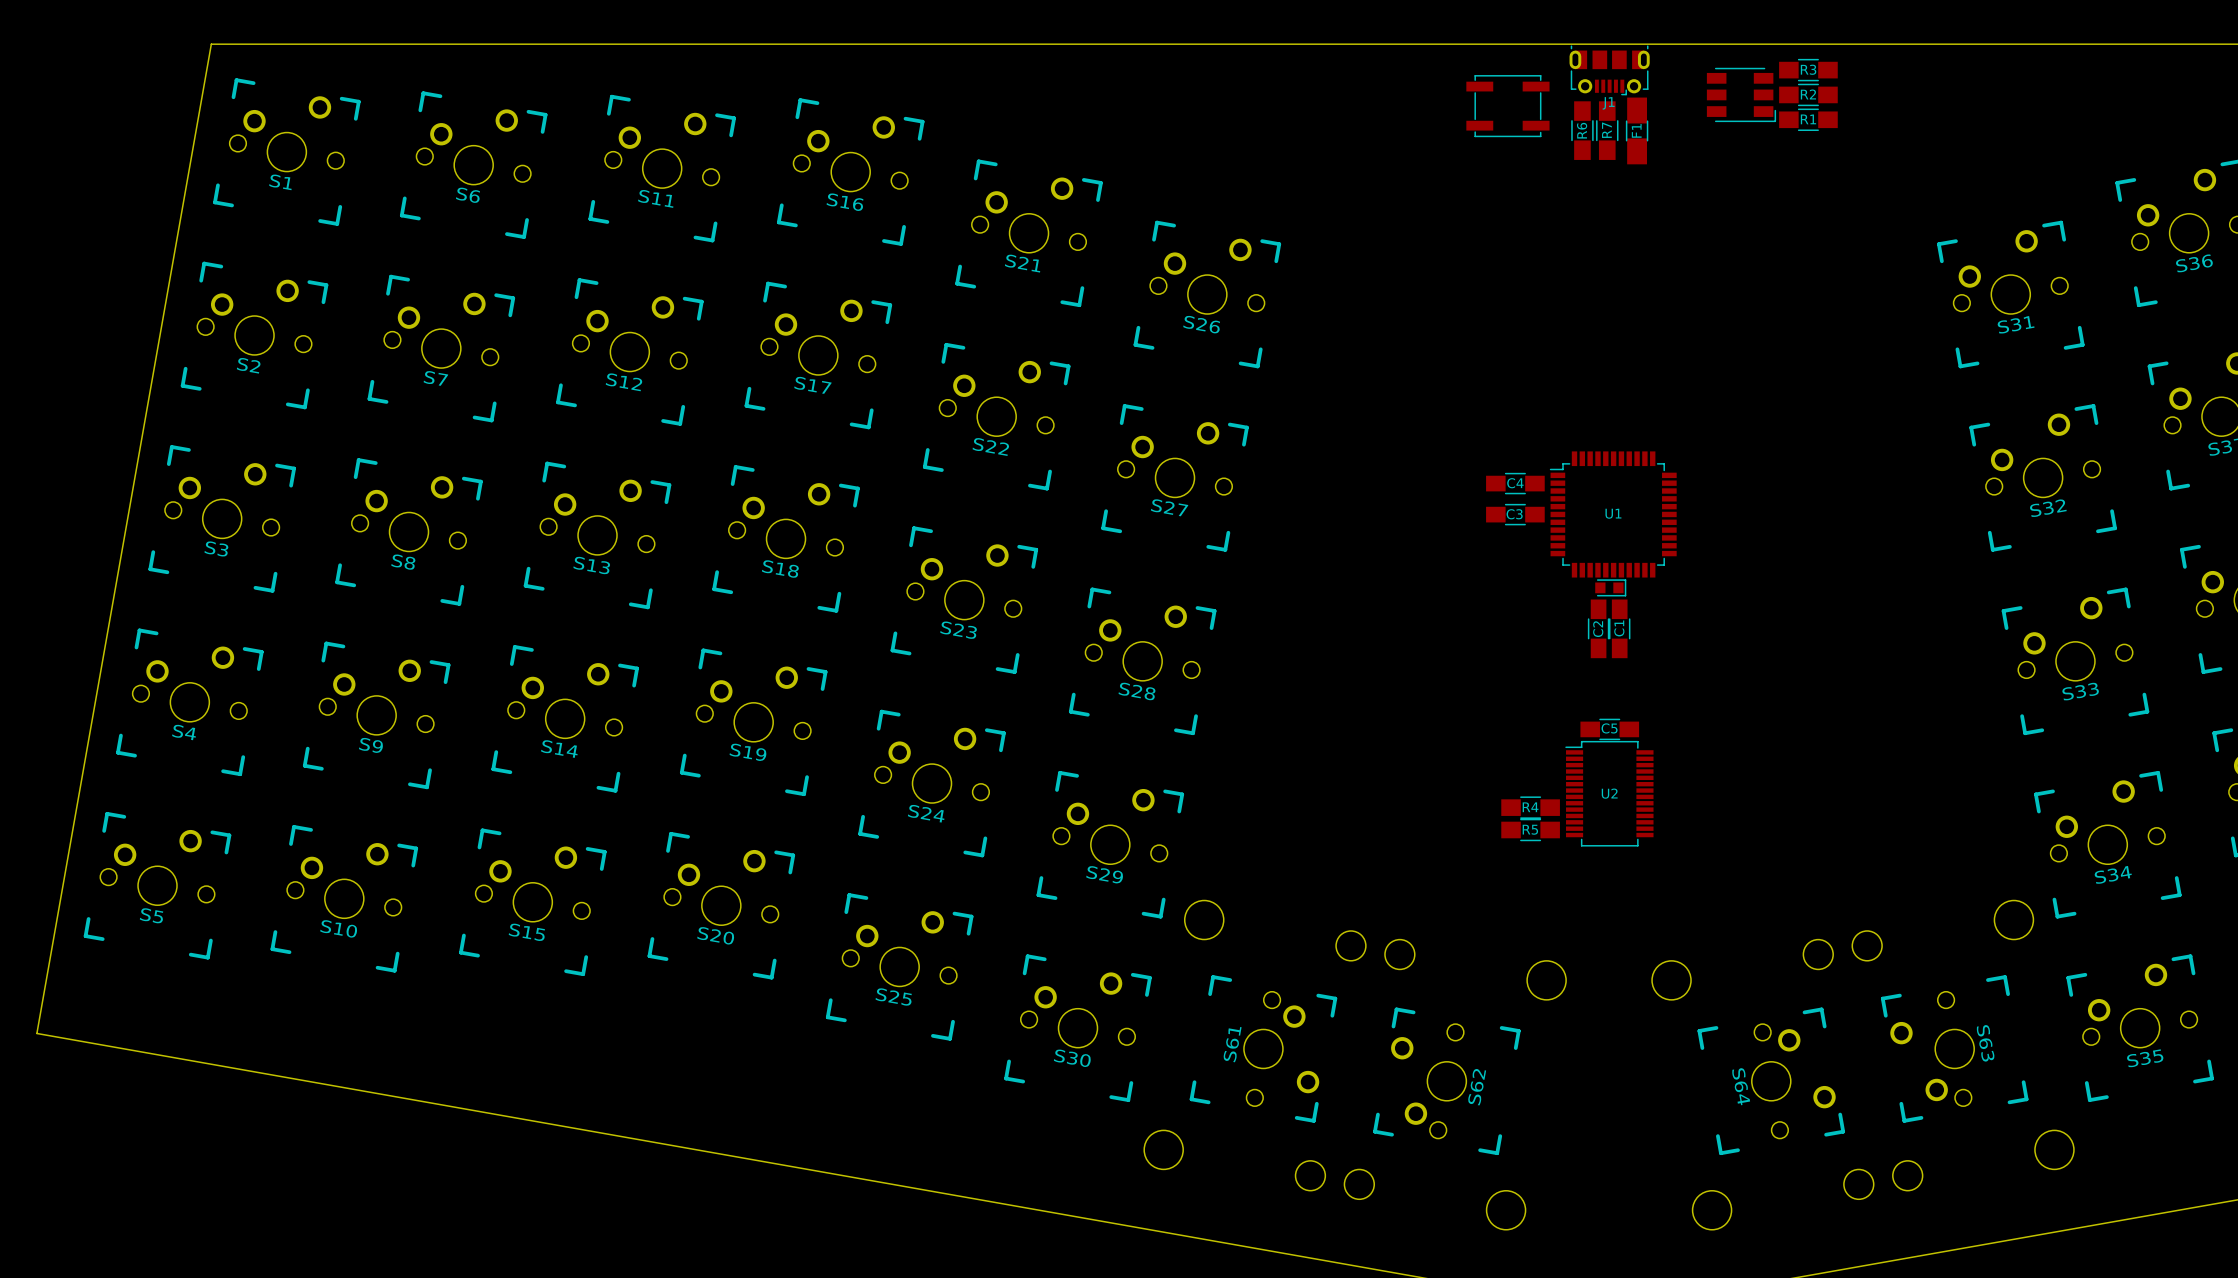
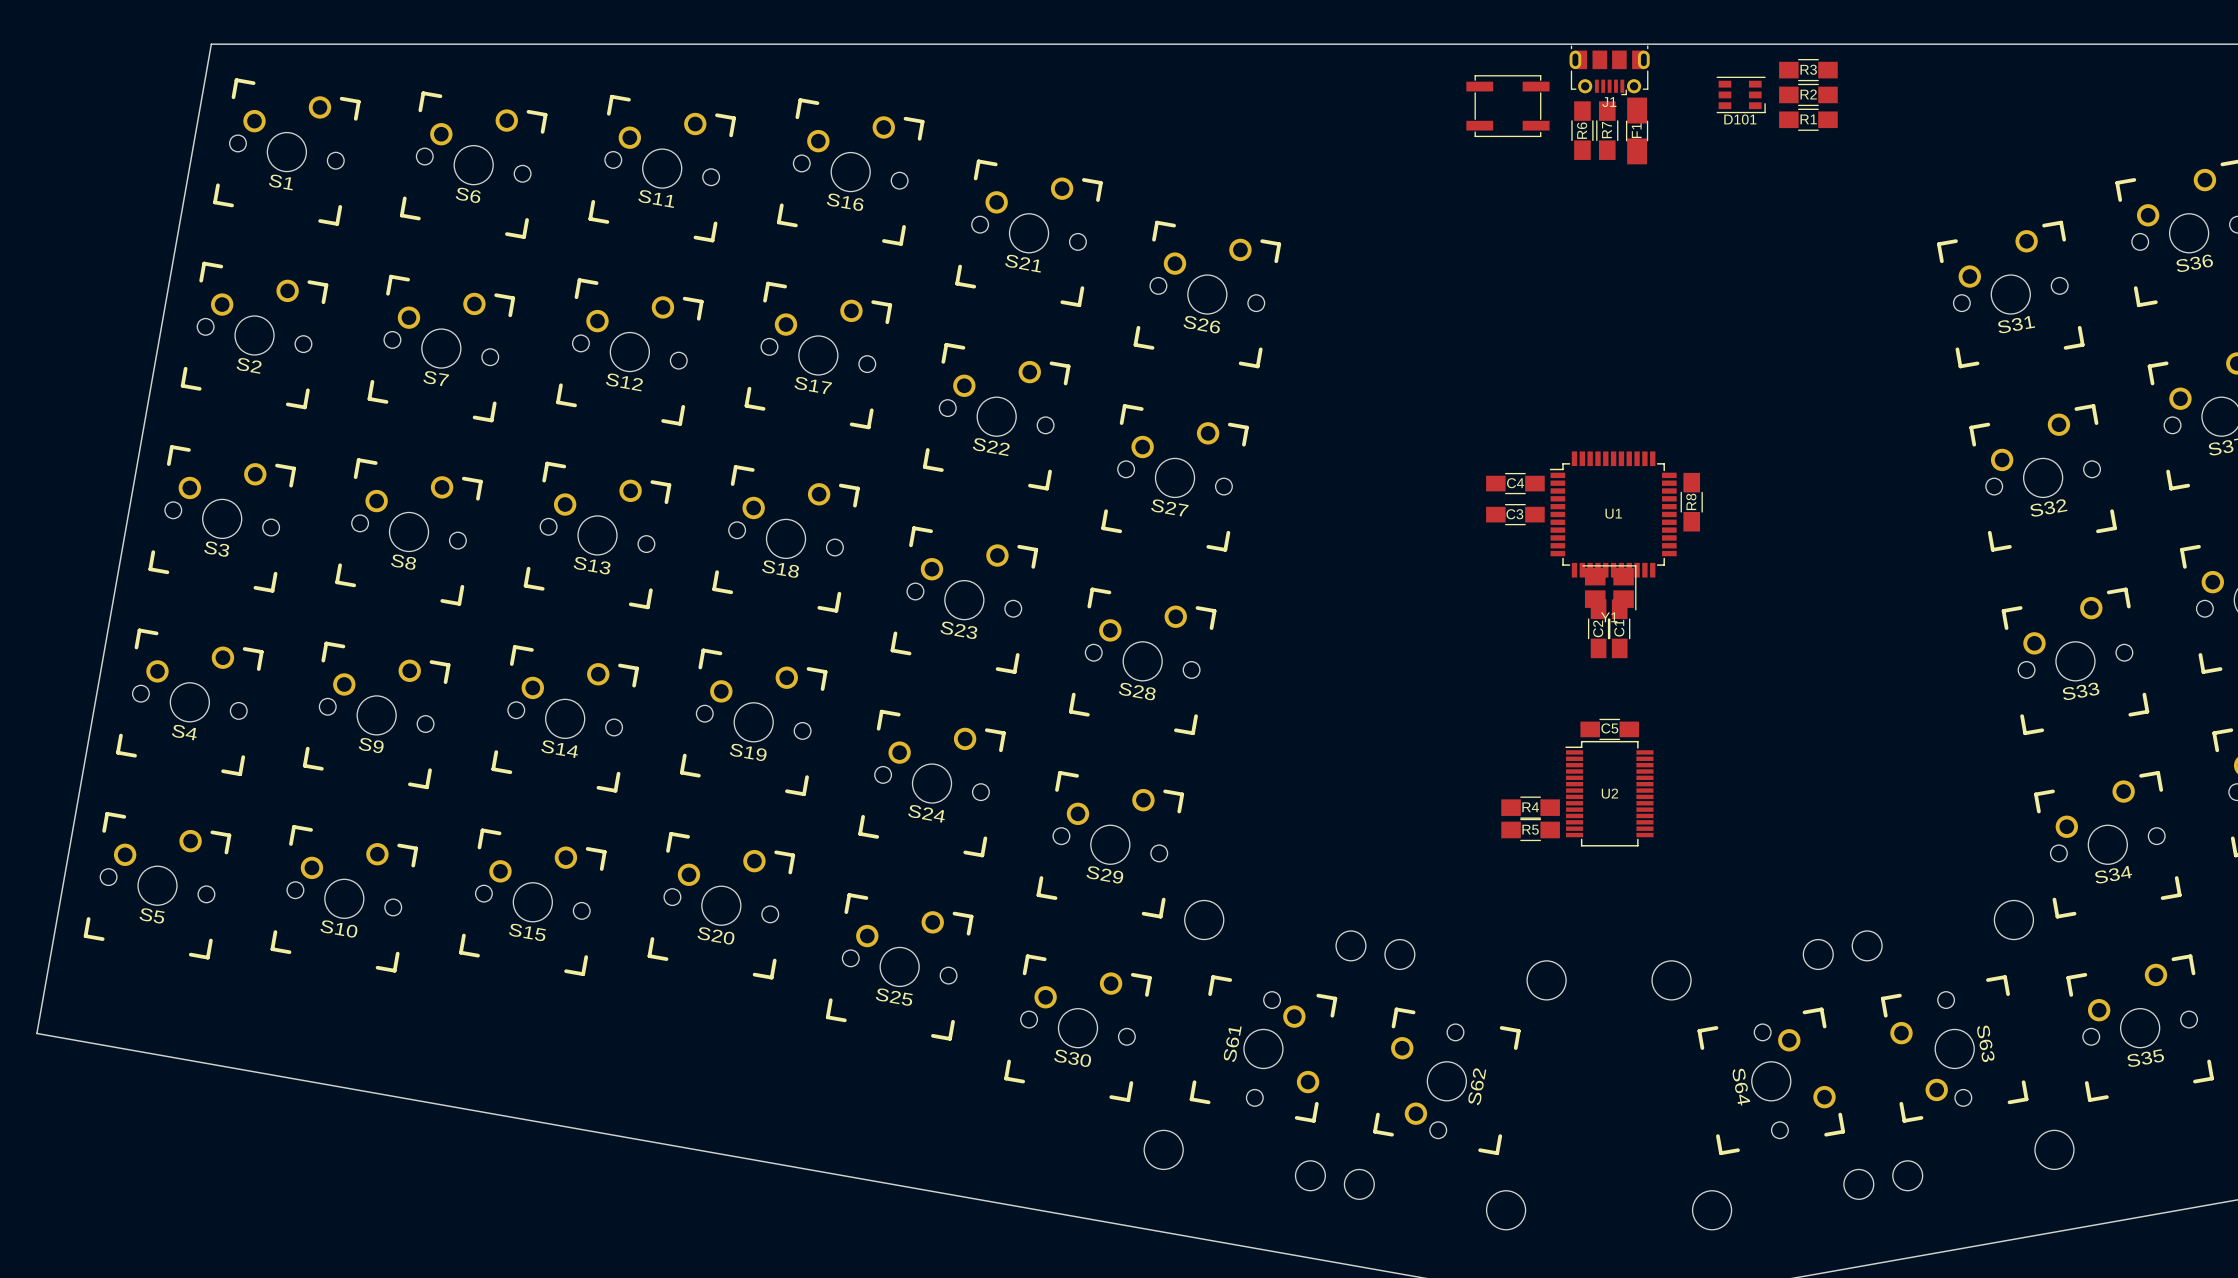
part: (1741, 94) -> none
D101: none -> (1741, 94)
R8: none -> (1691, 502)
Y1: none -> (1609, 587)
part: (1610, 587) -> none

